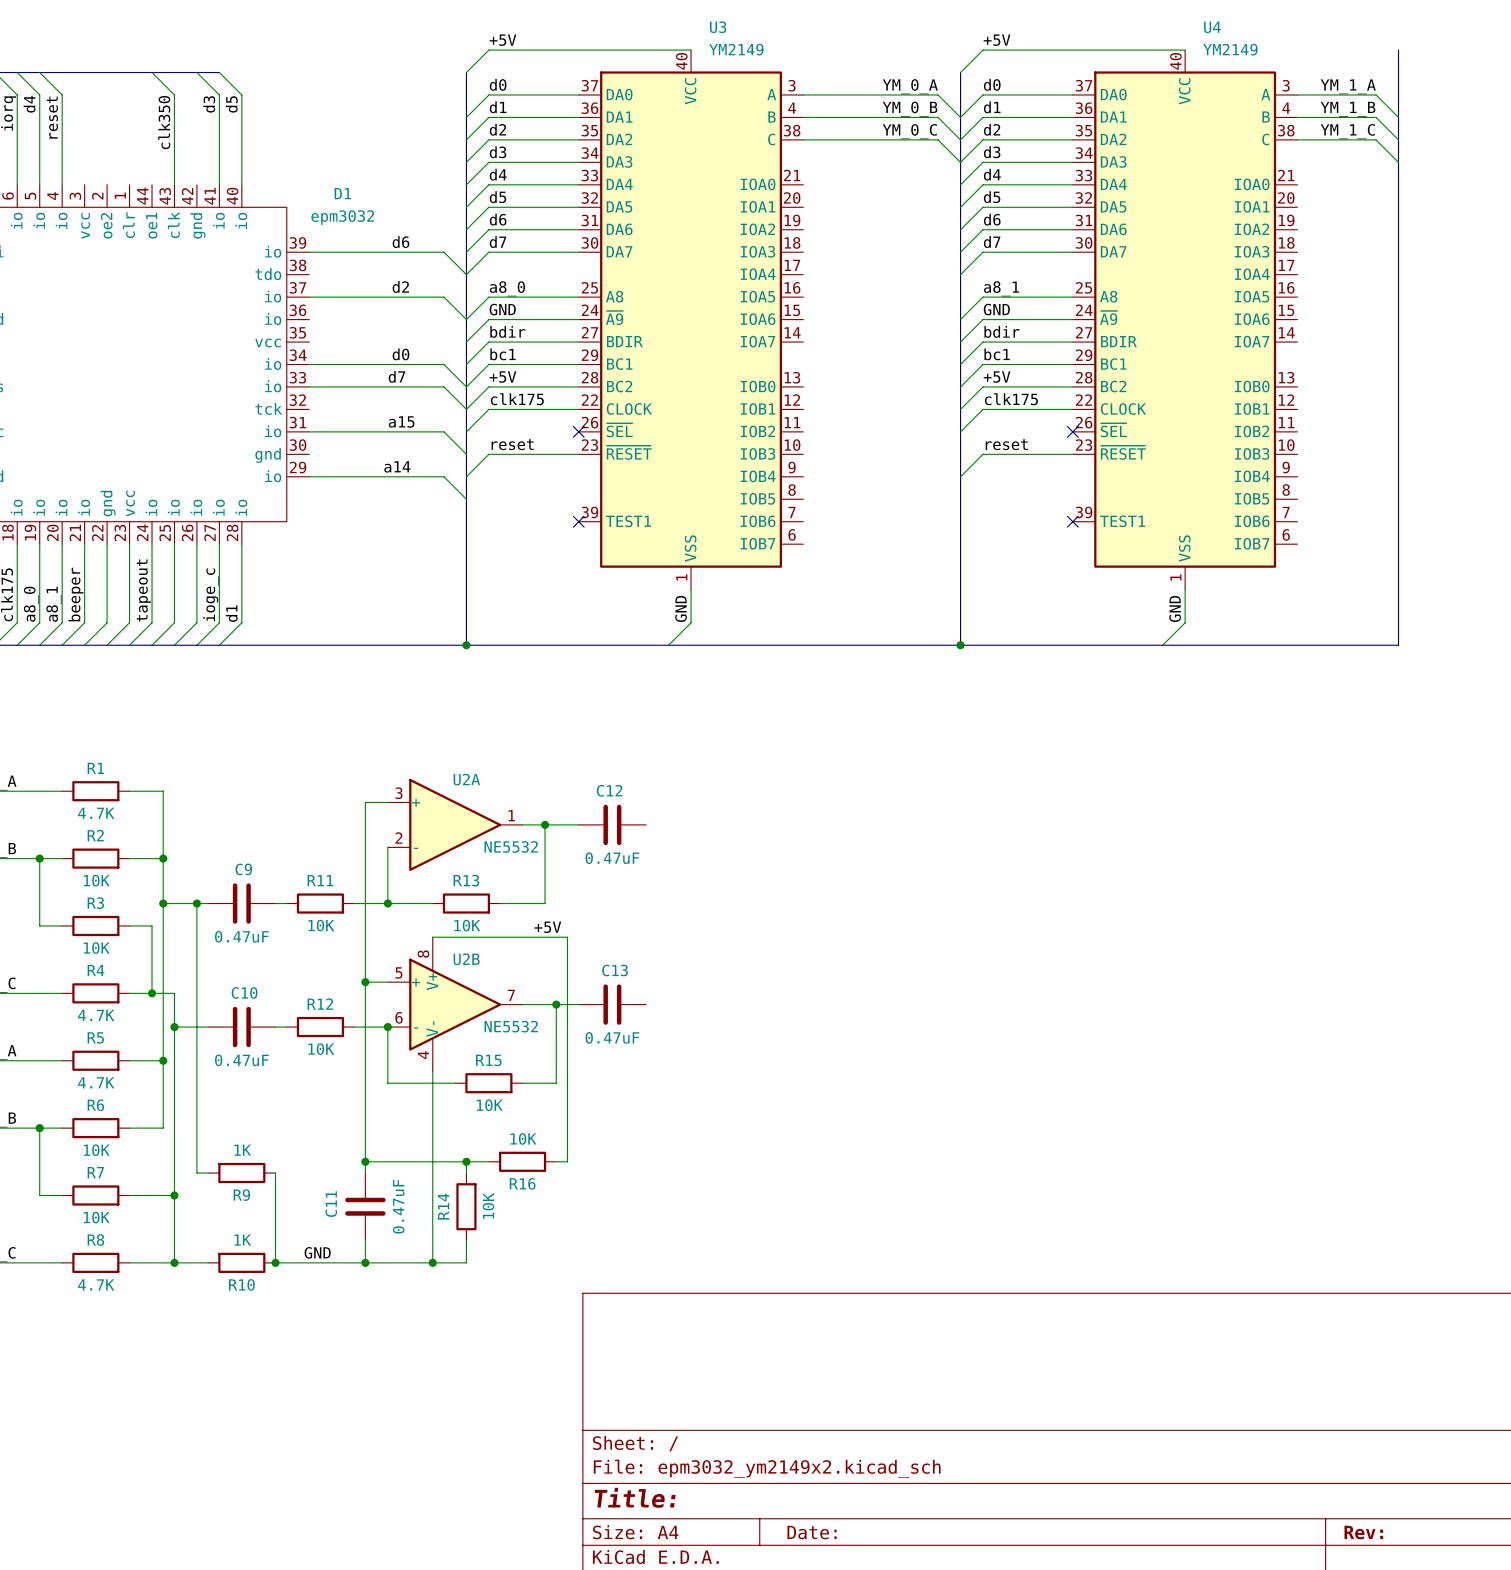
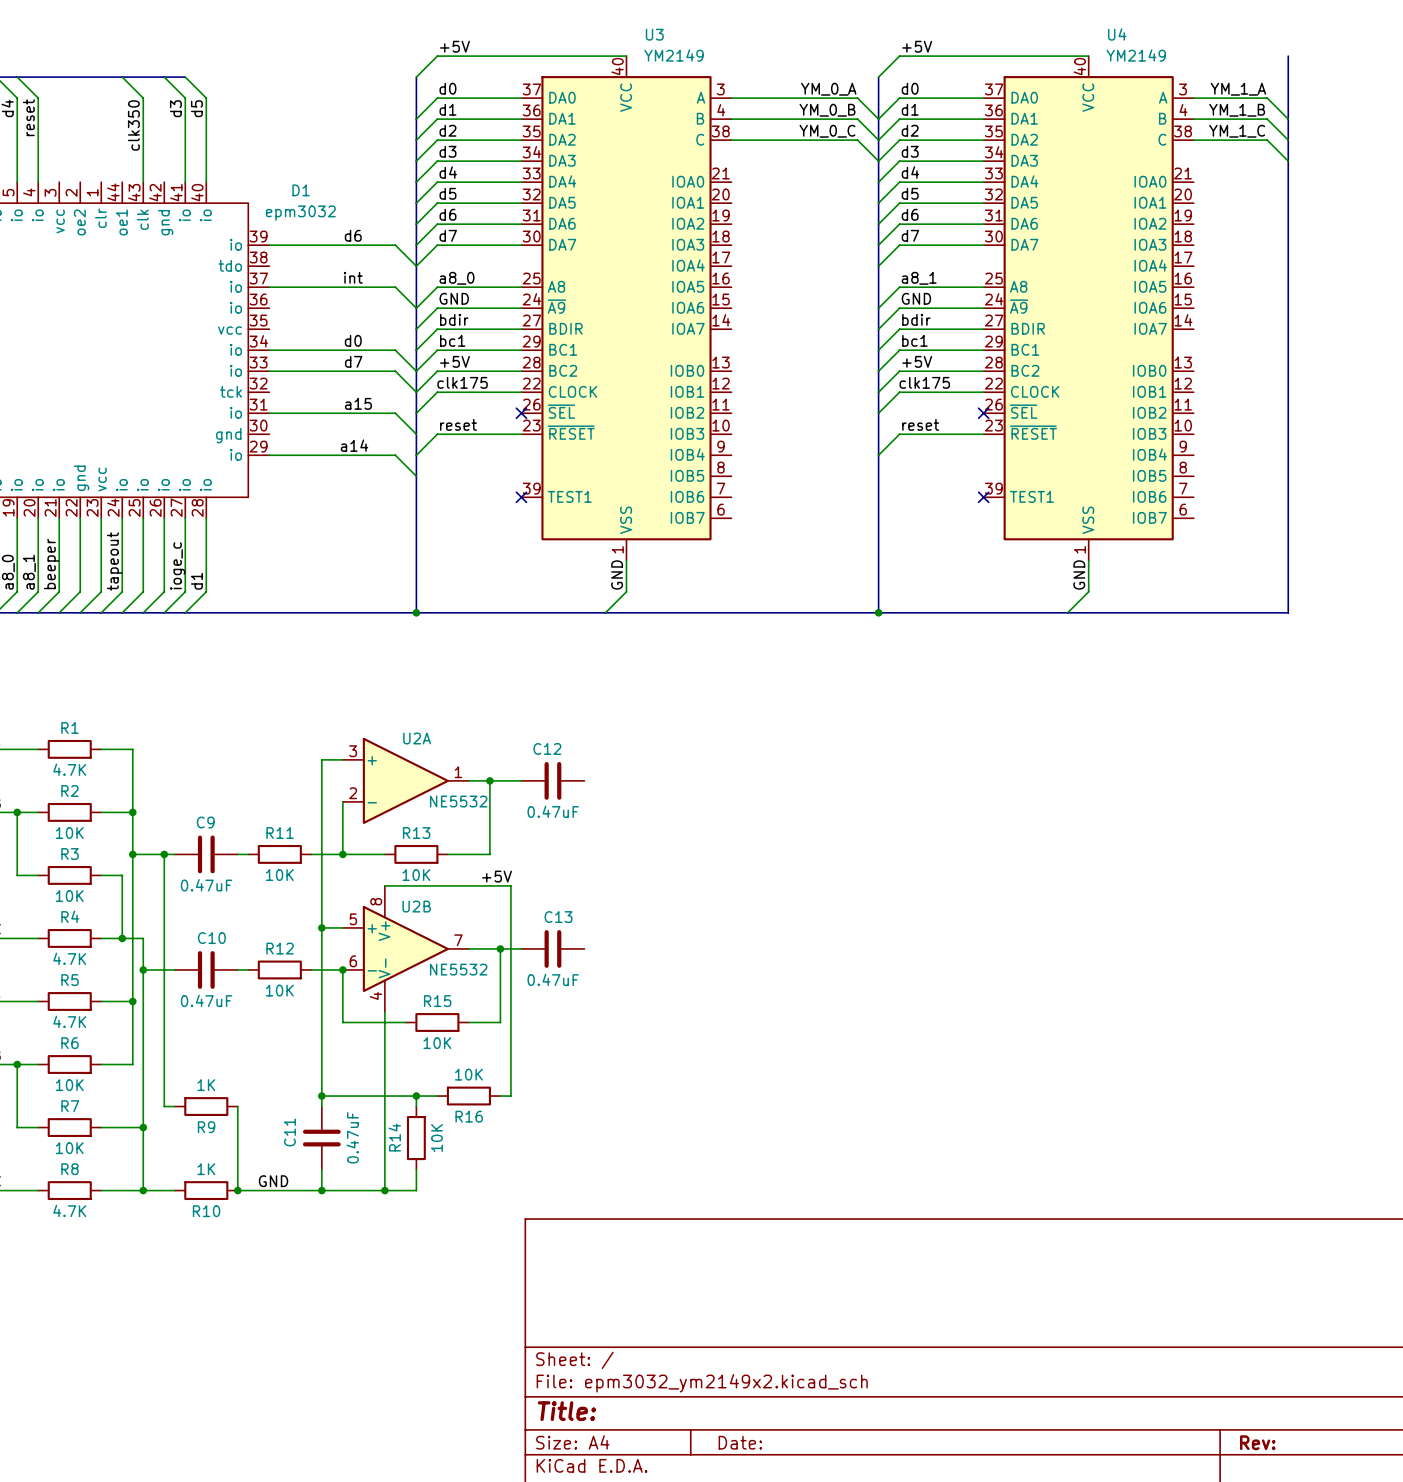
label: d2 (400, 286) -> int (353, 277)

